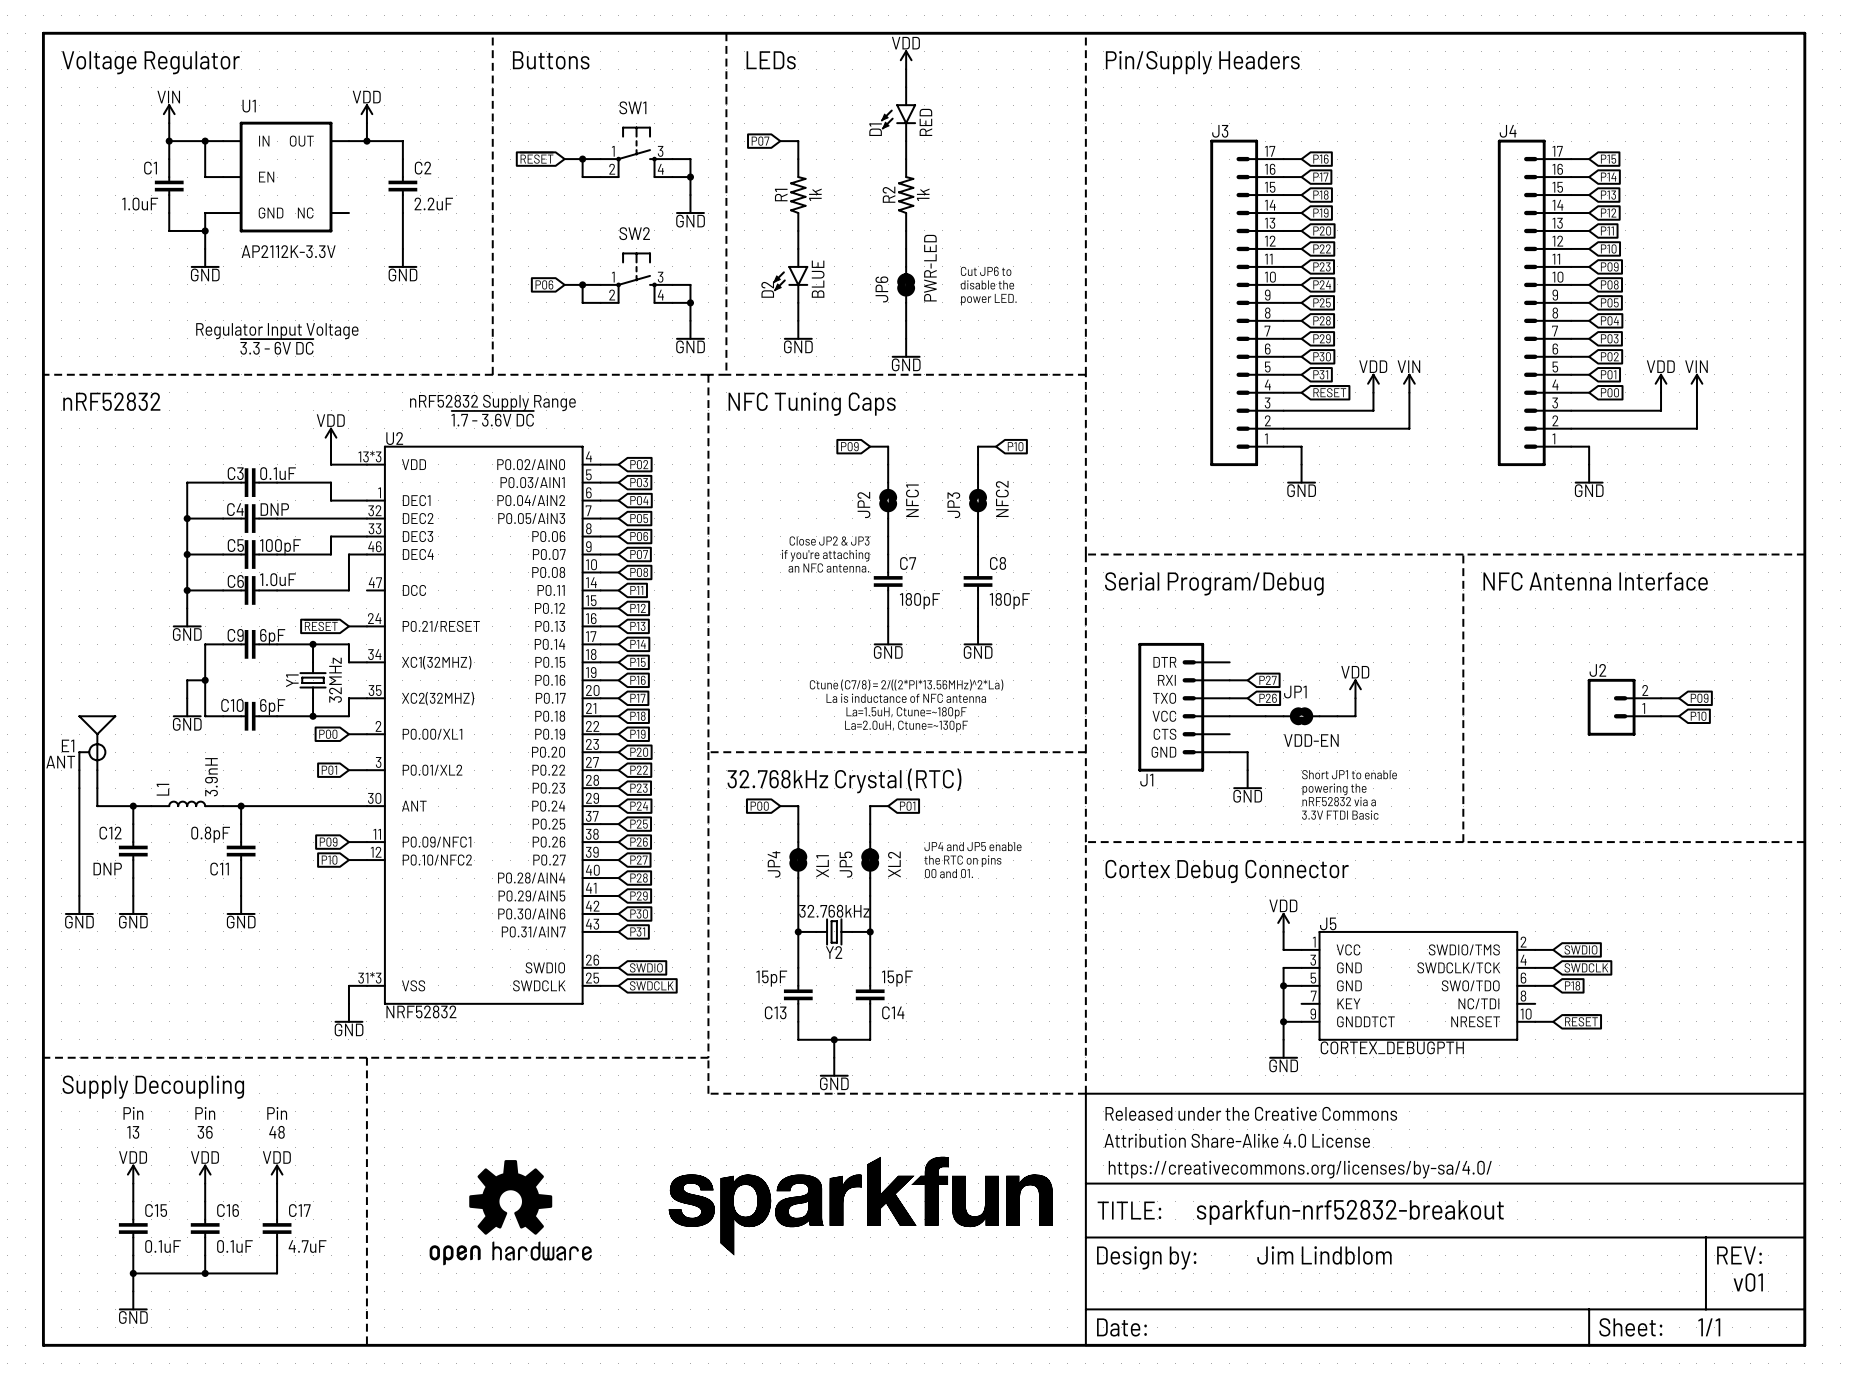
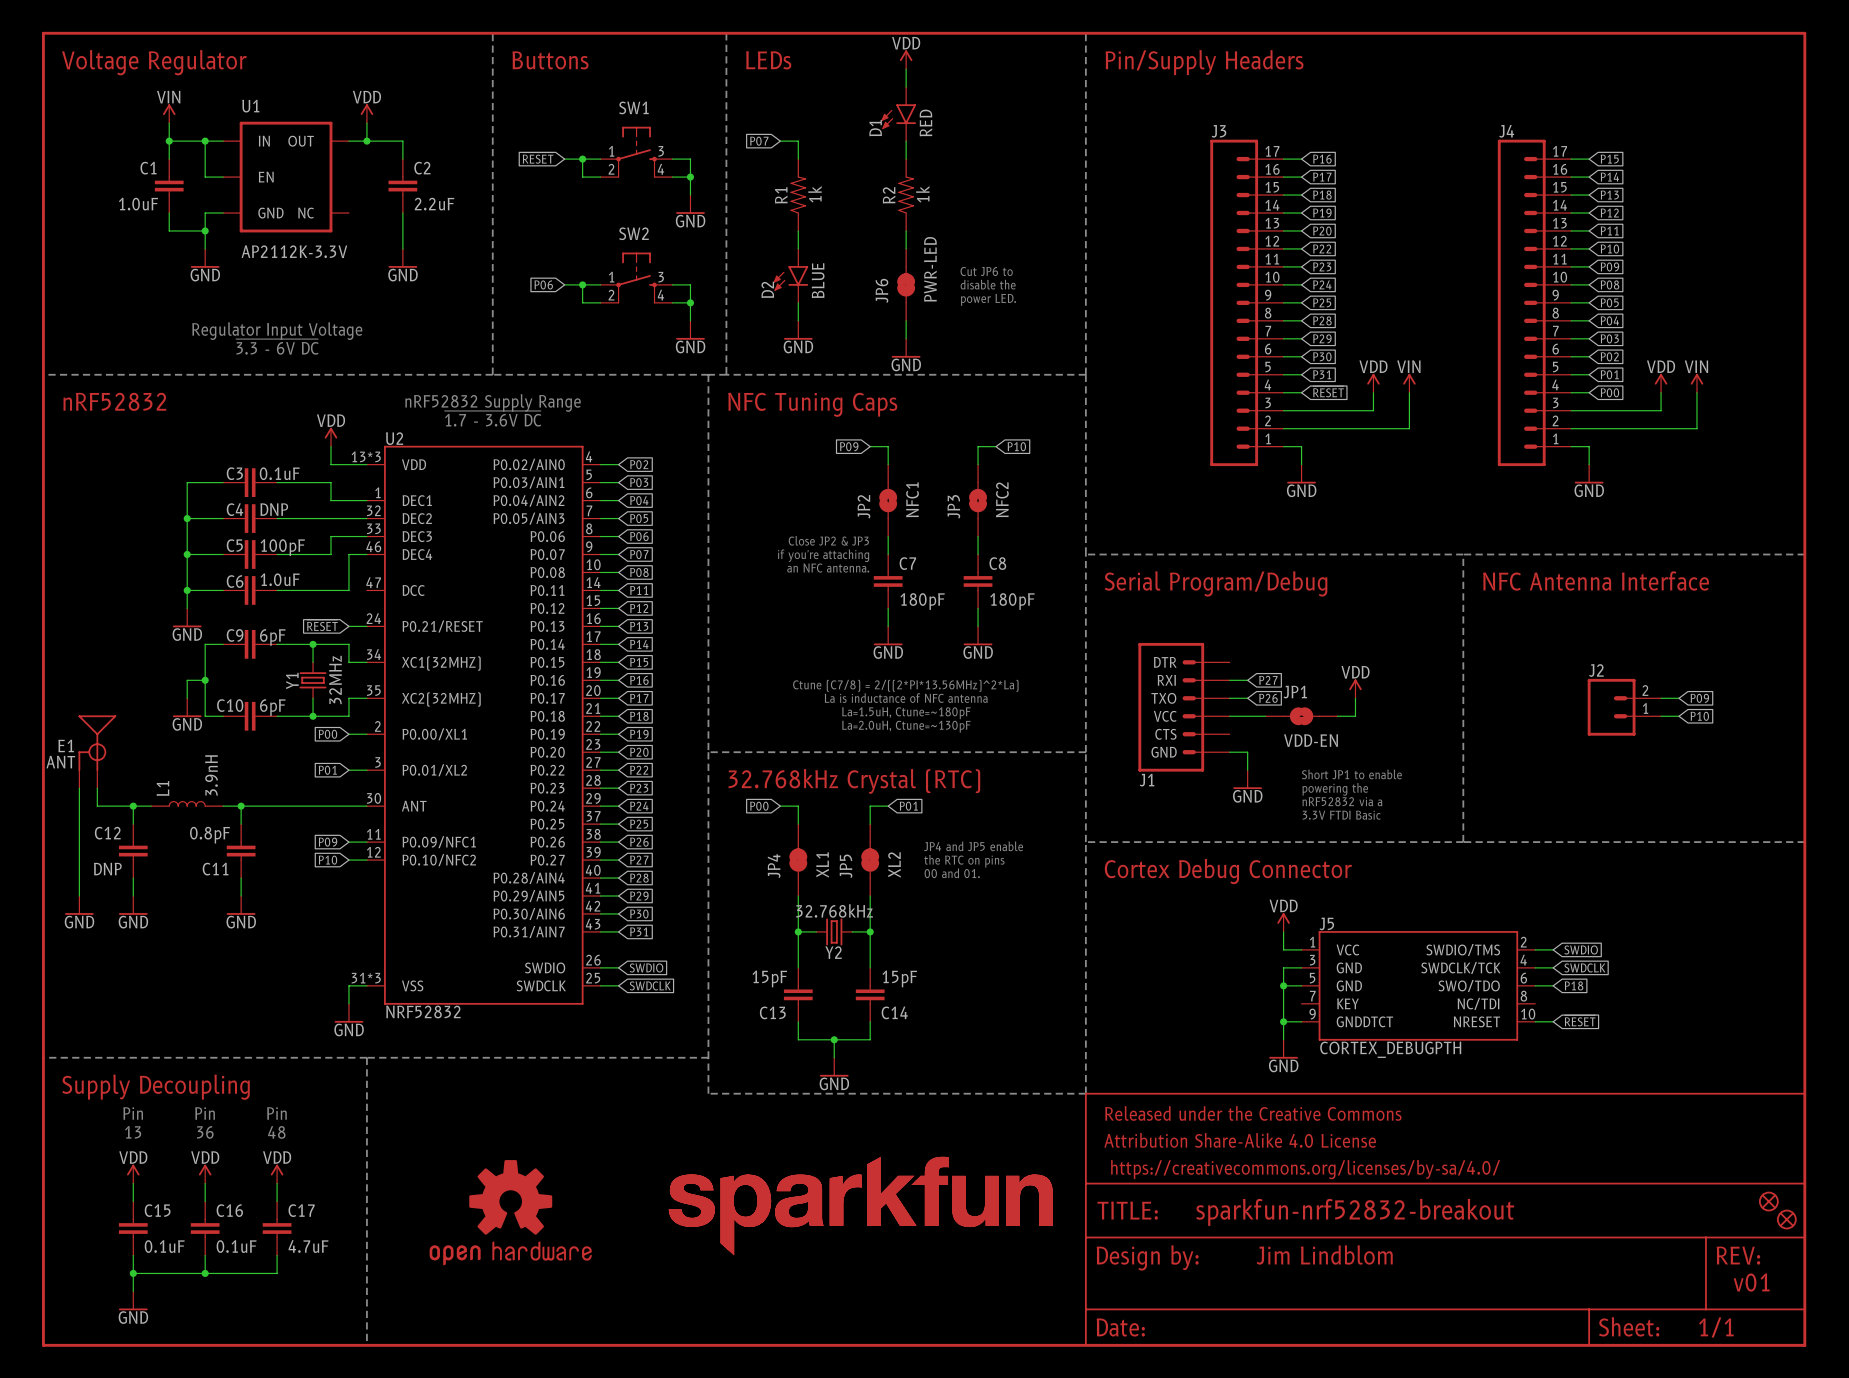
part: none -> (1768, 1201)
part: none -> (1786, 1219)

